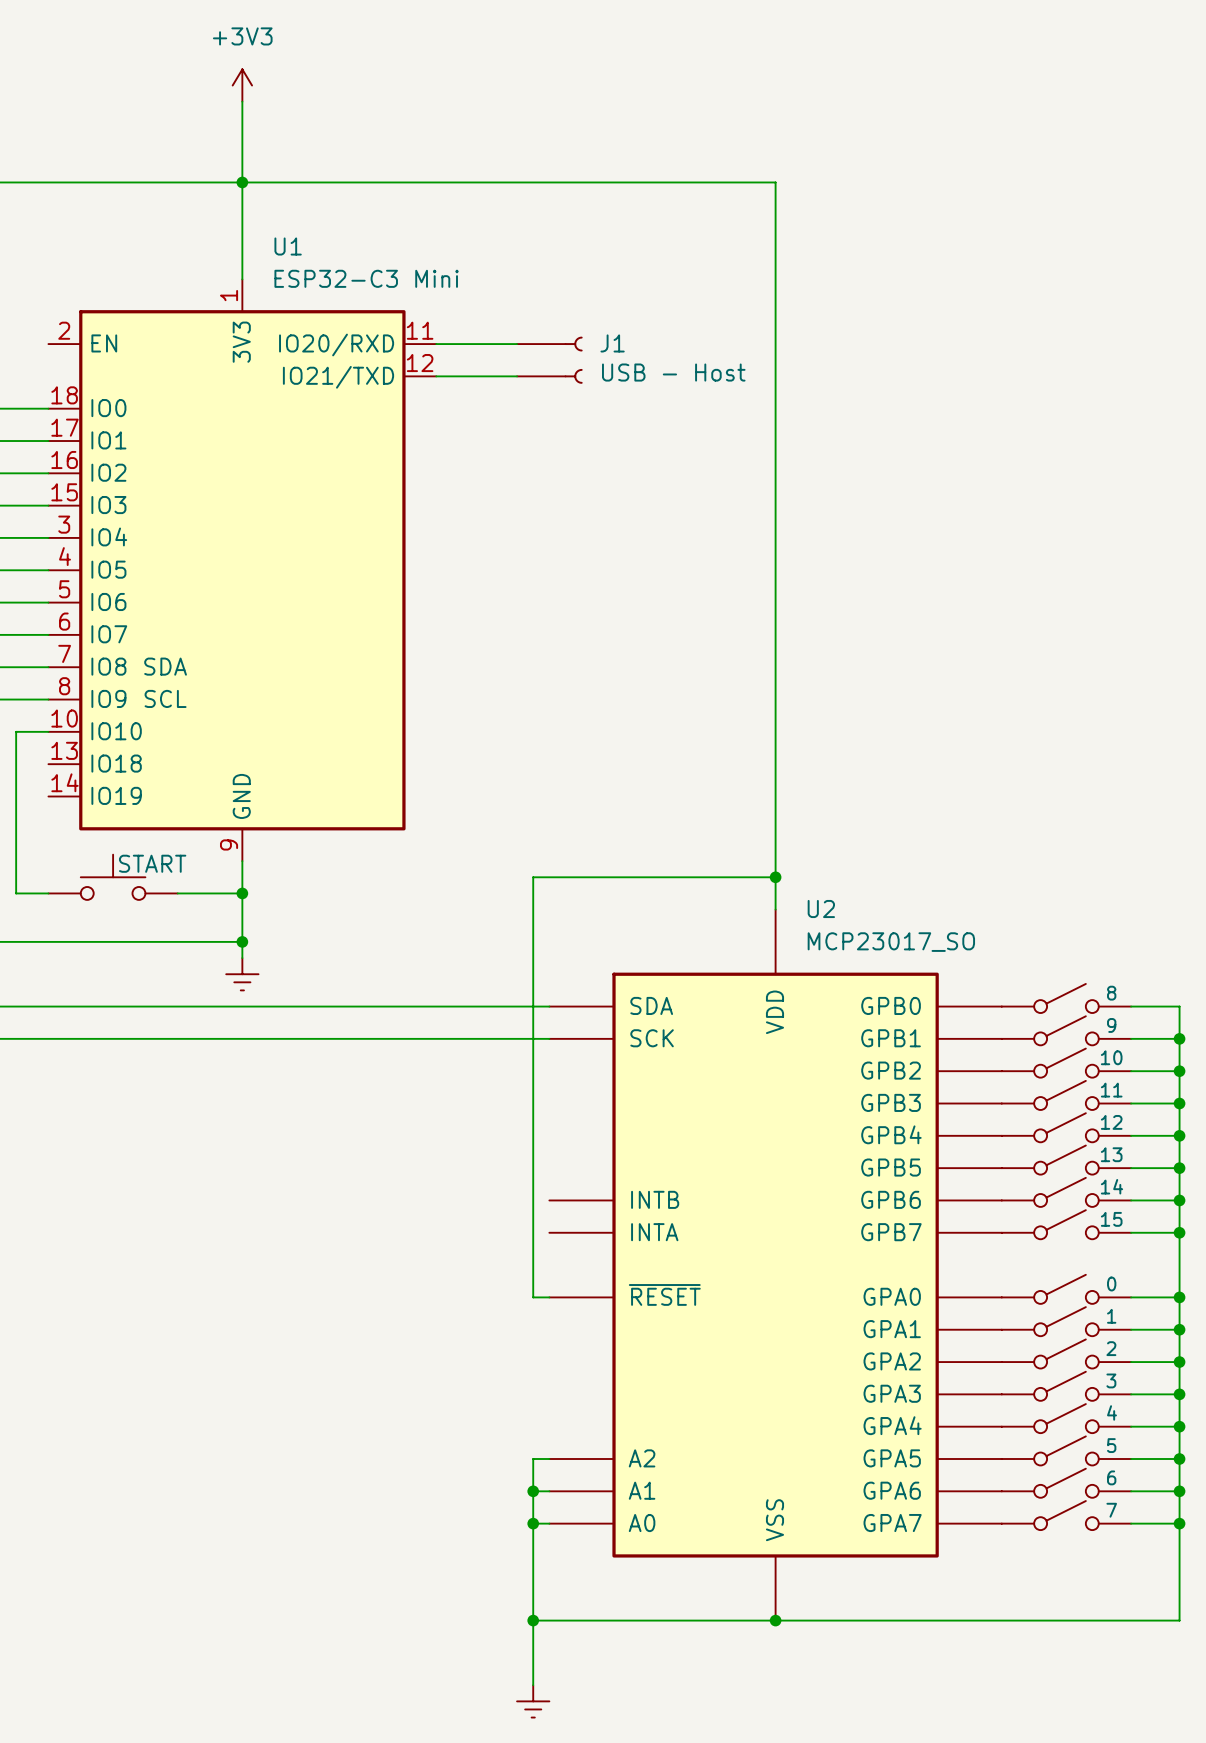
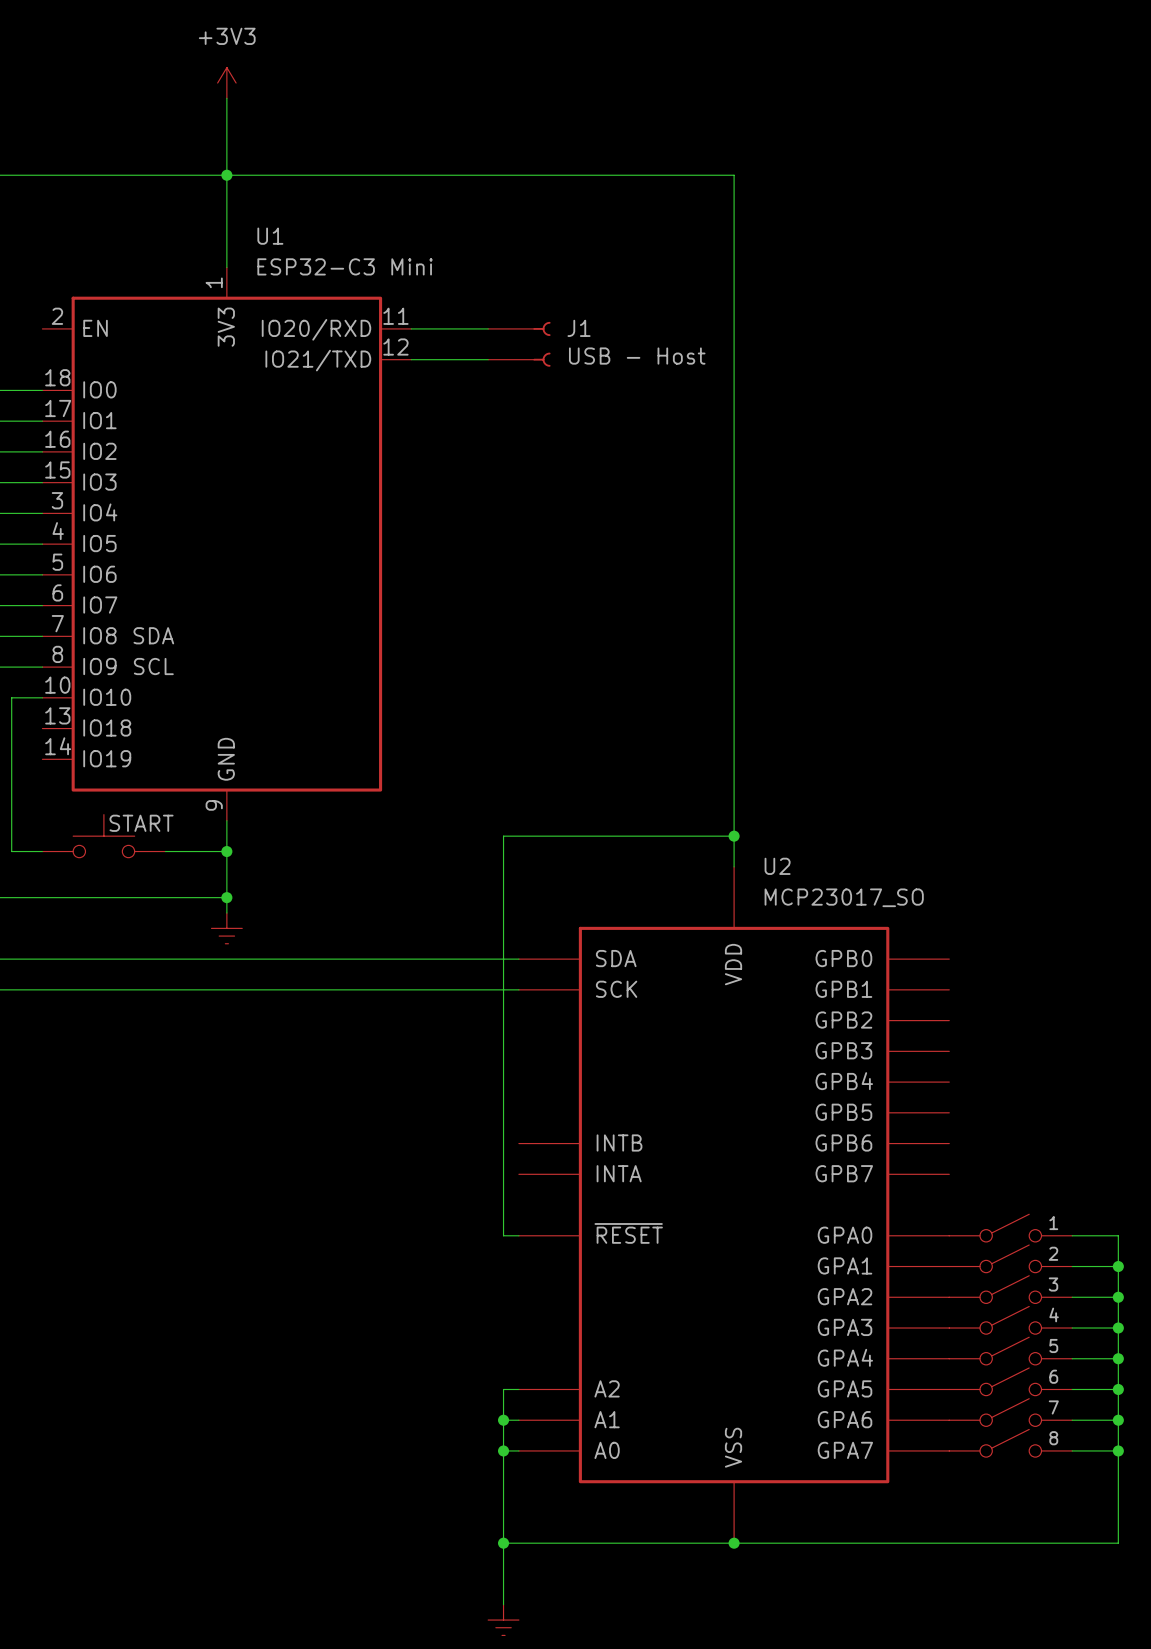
part: 8 (1066, 998) -> none
wire: (1131, 1006) (1179, 1006) (1179, 1297) -> none
part: 9 (1066, 1030) -> none
wire: (1131, 1038) (1179, 1038) -> none
junction: (1179, 1038) -> none
part: 10 (1066, 1063) -> none
wire: (1131, 1071) (1179, 1071) -> none
junction: (1179, 1071) -> none
part: 11 (1066, 1095) -> none
wire: (1131, 1103) (1179, 1103) -> none
junction: (1179, 1103) -> none
part: 12 (1066, 1127) -> none
wire: (1131, 1135) (1179, 1135) -> none
junction: (1179, 1135) -> none
part: 13 (1066, 1160) -> none
wire: (1131, 1168) (1179, 1168) -> none
junction: (1179, 1168) -> none
part: 14 (1066, 1192) -> none
wire: (1131, 1200) (1179, 1200) -> none
junction: (1179, 1200) -> none
part: 15 (1066, 1224) -> none
wire: (1131, 1232) (1179, 1232) -> none
junction: (1179, 1232) -> none
part value: 0 (1111, 1284) -> 1 (1053, 1223)
junction: (1179, 1297) -> none
part value: 1 (1111, 1316) -> 2 (1053, 1253)
part value: 2 (1111, 1348) -> 3 (1053, 1284)
part value: 3 (1111, 1380) -> 4 (1054, 1314)
part value: 4 (1112, 1412) -> 5 (1053, 1345)
part value: 5 (1111, 1445) -> 6 (1053, 1376)
part value: 6 (1111, 1477) -> 7 (1053, 1407)
part value: 7 (1111, 1510) -> 8 (1053, 1438)

